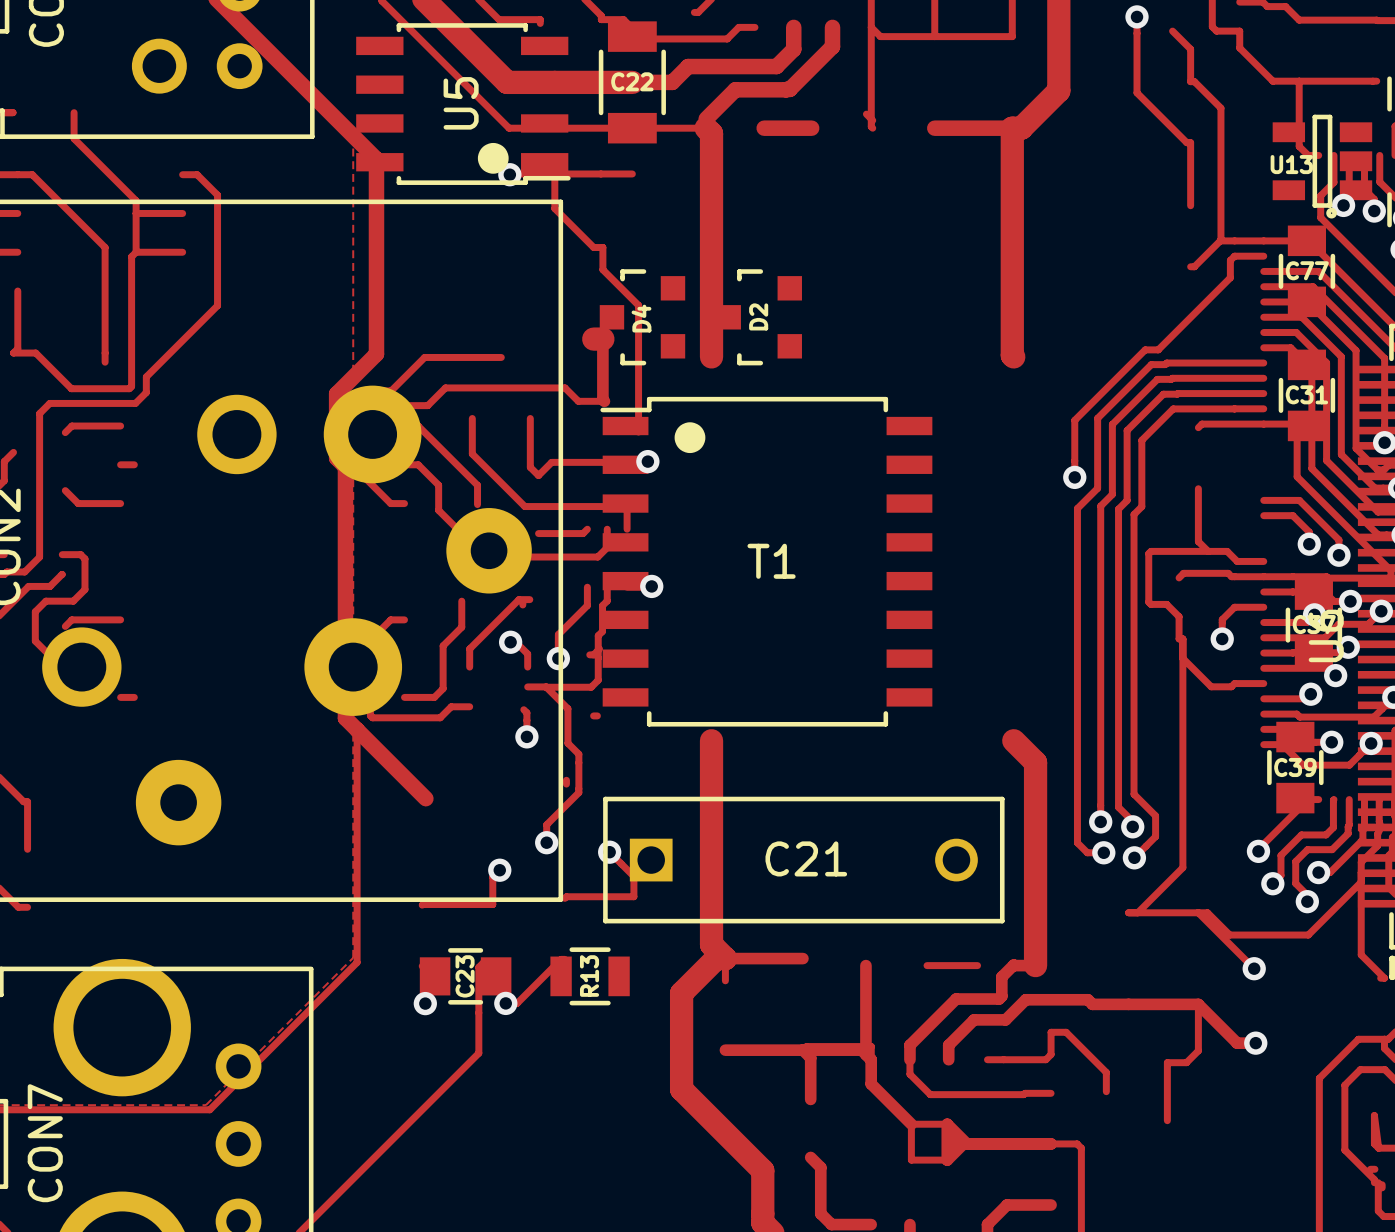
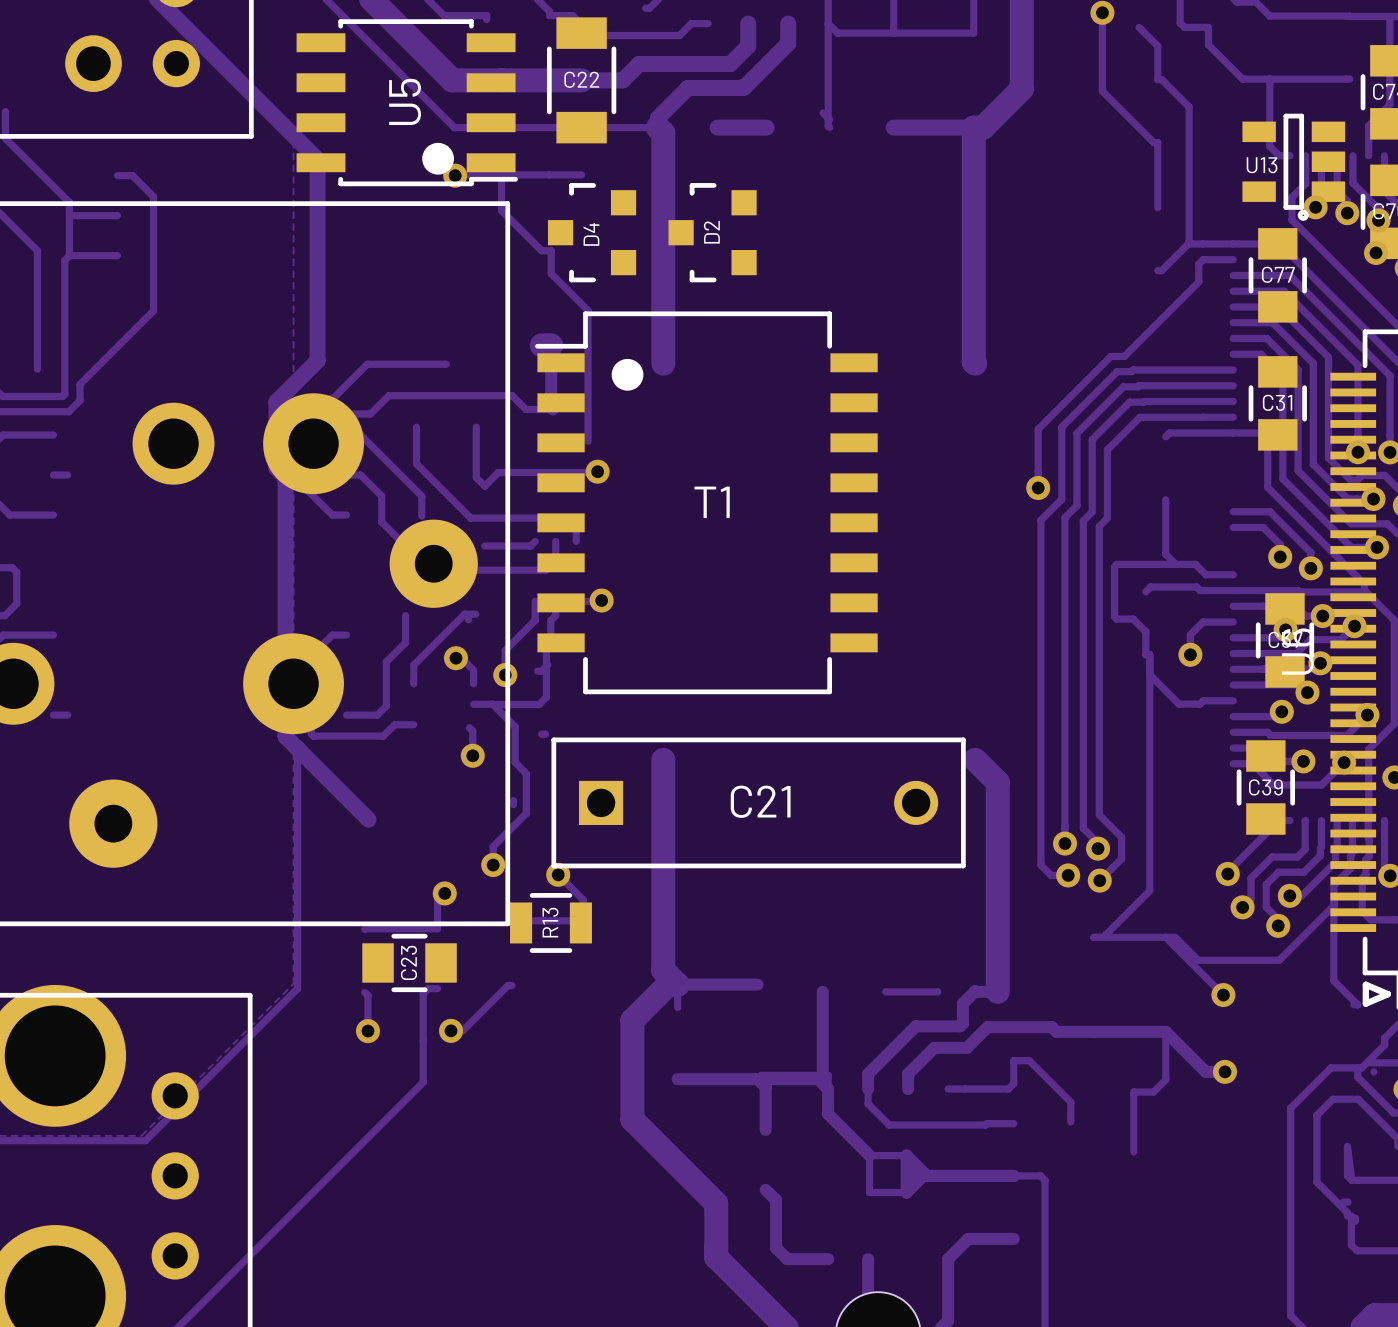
D4 position: (642, 317) -> (592, 232)
D2 position: (759, 317) -> (712, 232)
T1 footprint: [600, 396, 933, 727] -> [535, 311, 878, 695]
C21 position: (803, 860) -> (758, 802)
C23 position: (465, 976) -> (409, 962)
R13 position: (590, 976) -> (550, 922)

